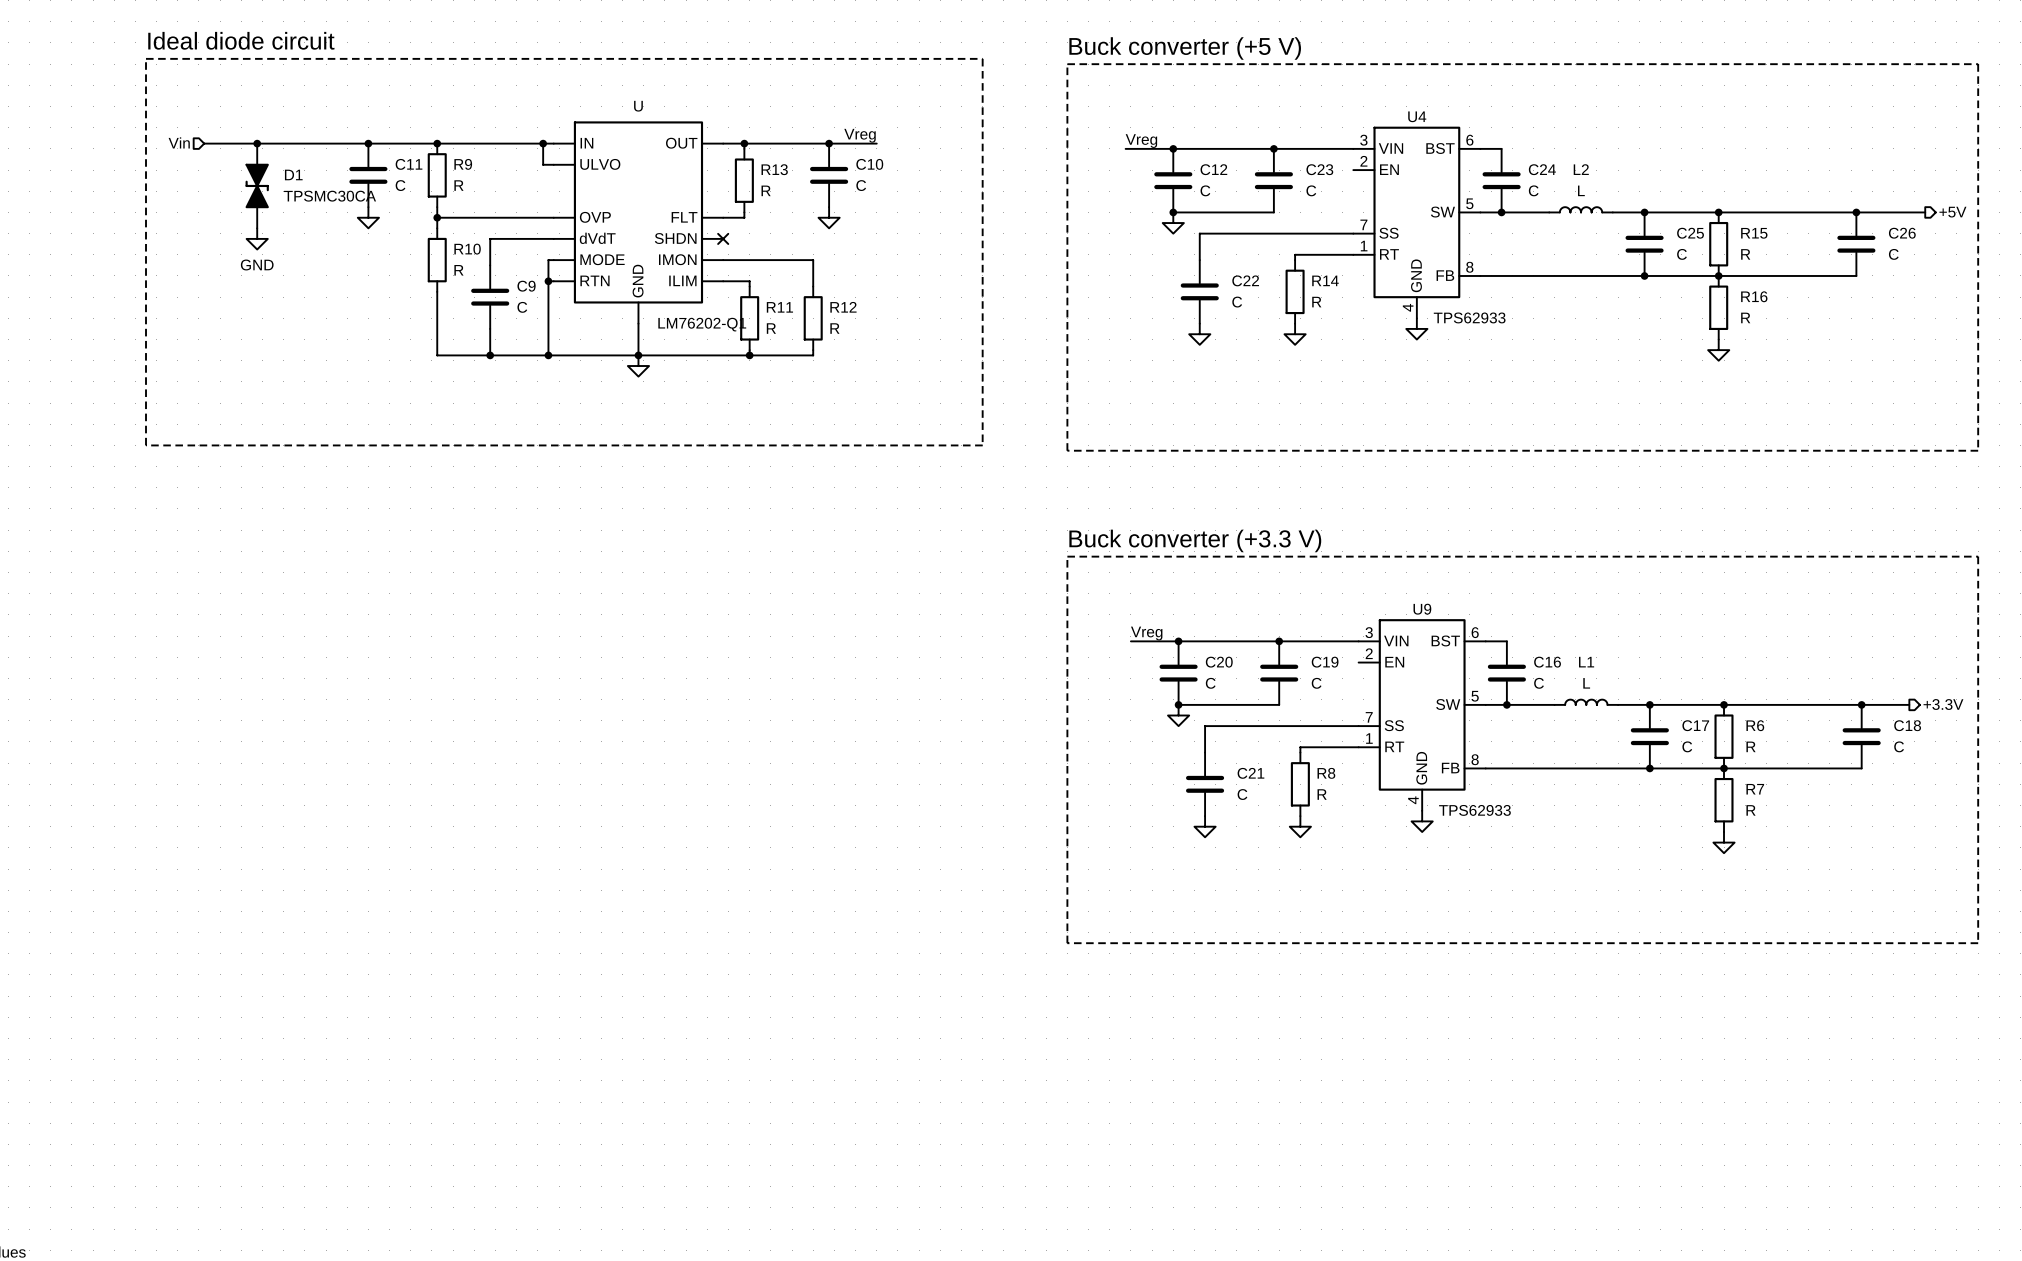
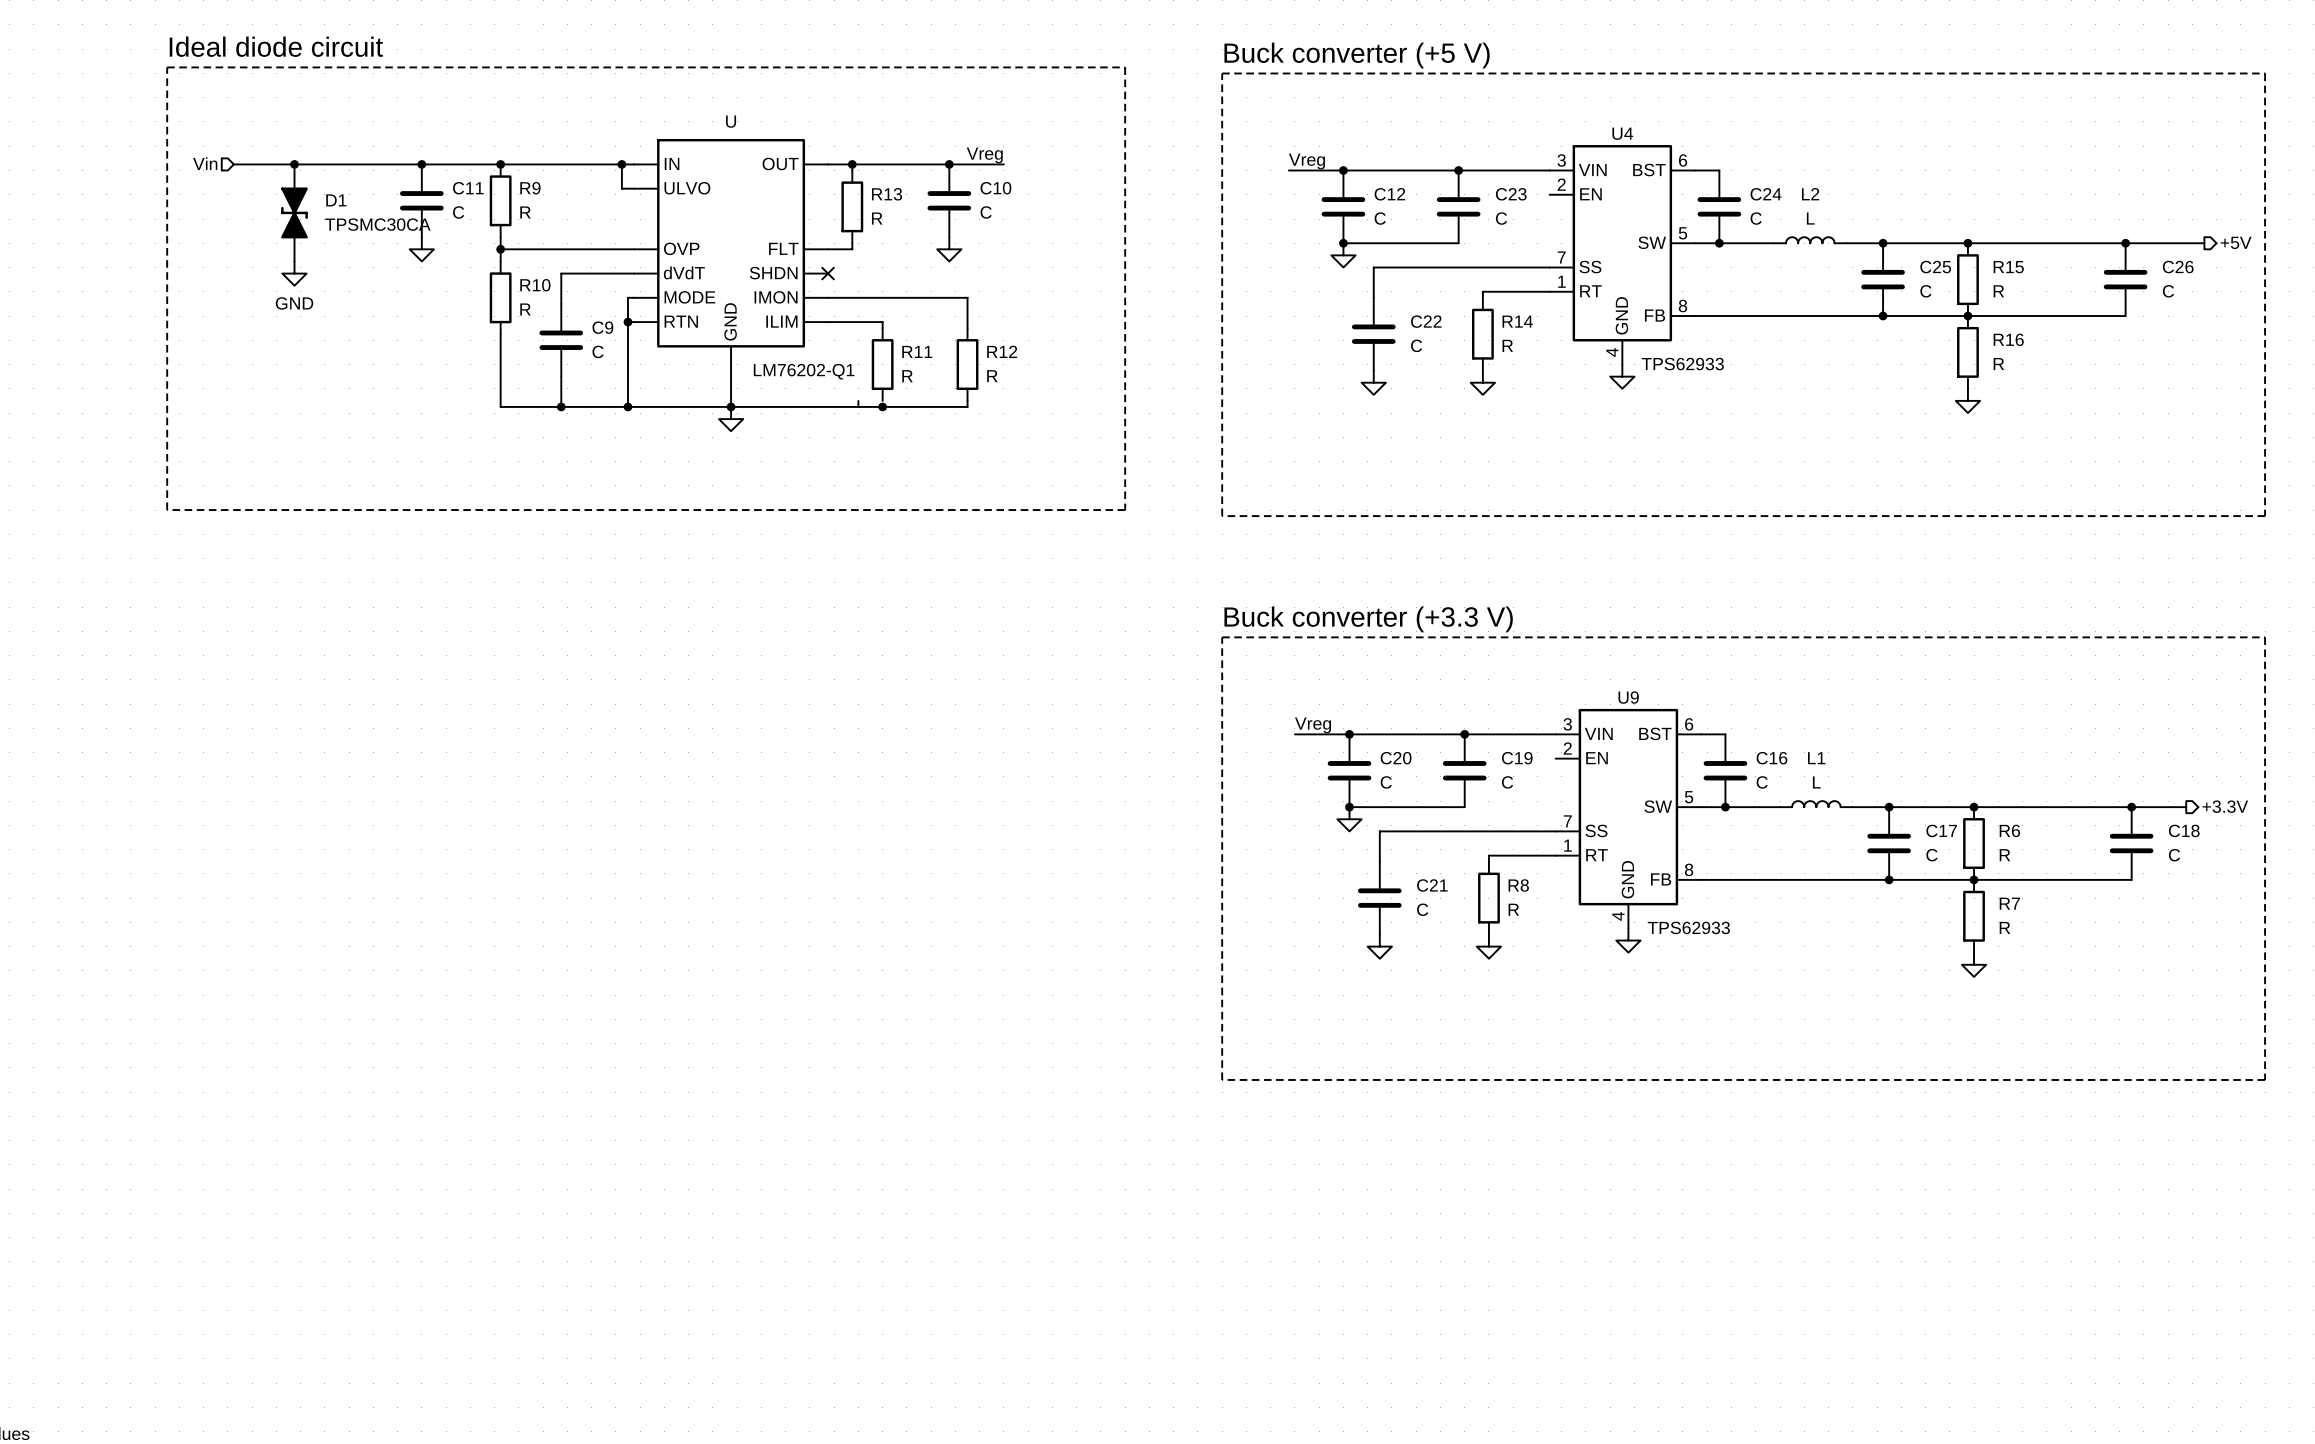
wire: (813, 260) (813, 286) -> (931, 297) (967, 297) (967, 328)
wire: (749, 281) (749, 286) -> (858, 322) (882, 322) (882, 328)
R11 position: (749, 318) -> (882, 364)
R12 position: (813, 318) -> (967, 364)
wire: (813, 350) (813, 355) -> (967, 400) (967, 406) (931, 406)
junction position: (749, 355) -> (882, 406)

